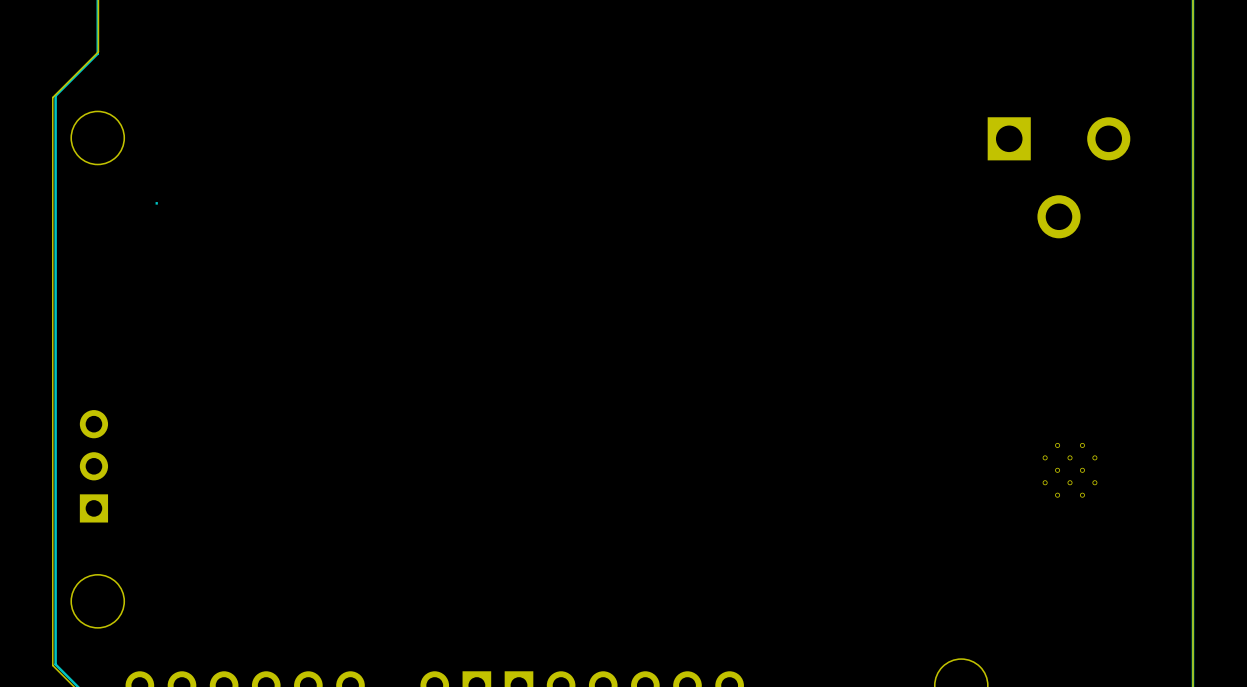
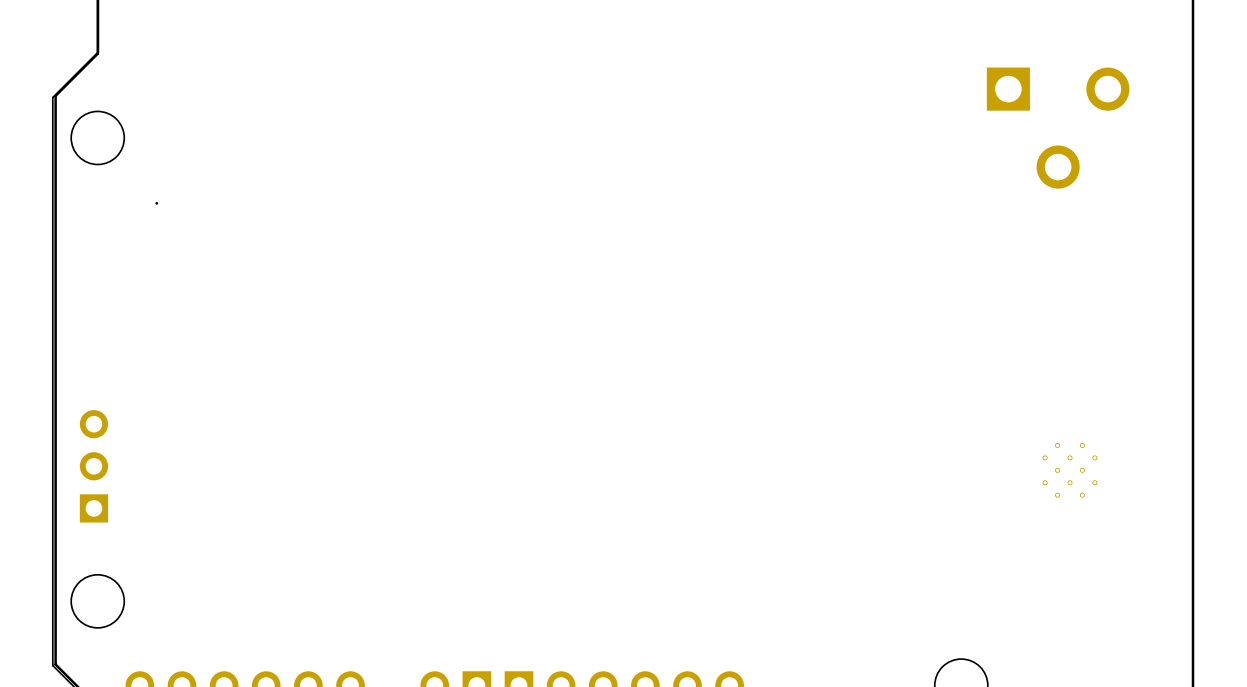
part position: (1058, 177) -> (1058, 128)

